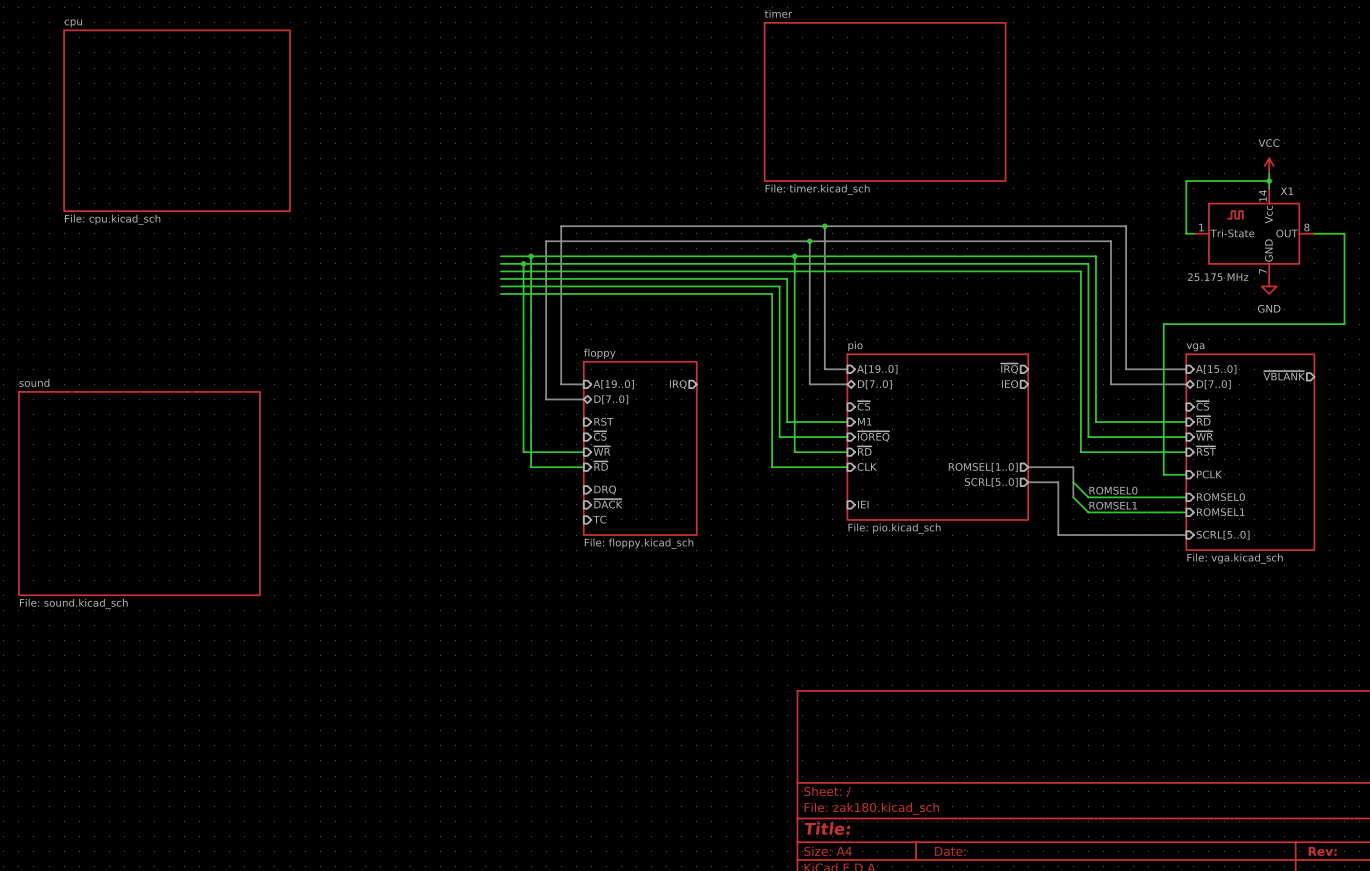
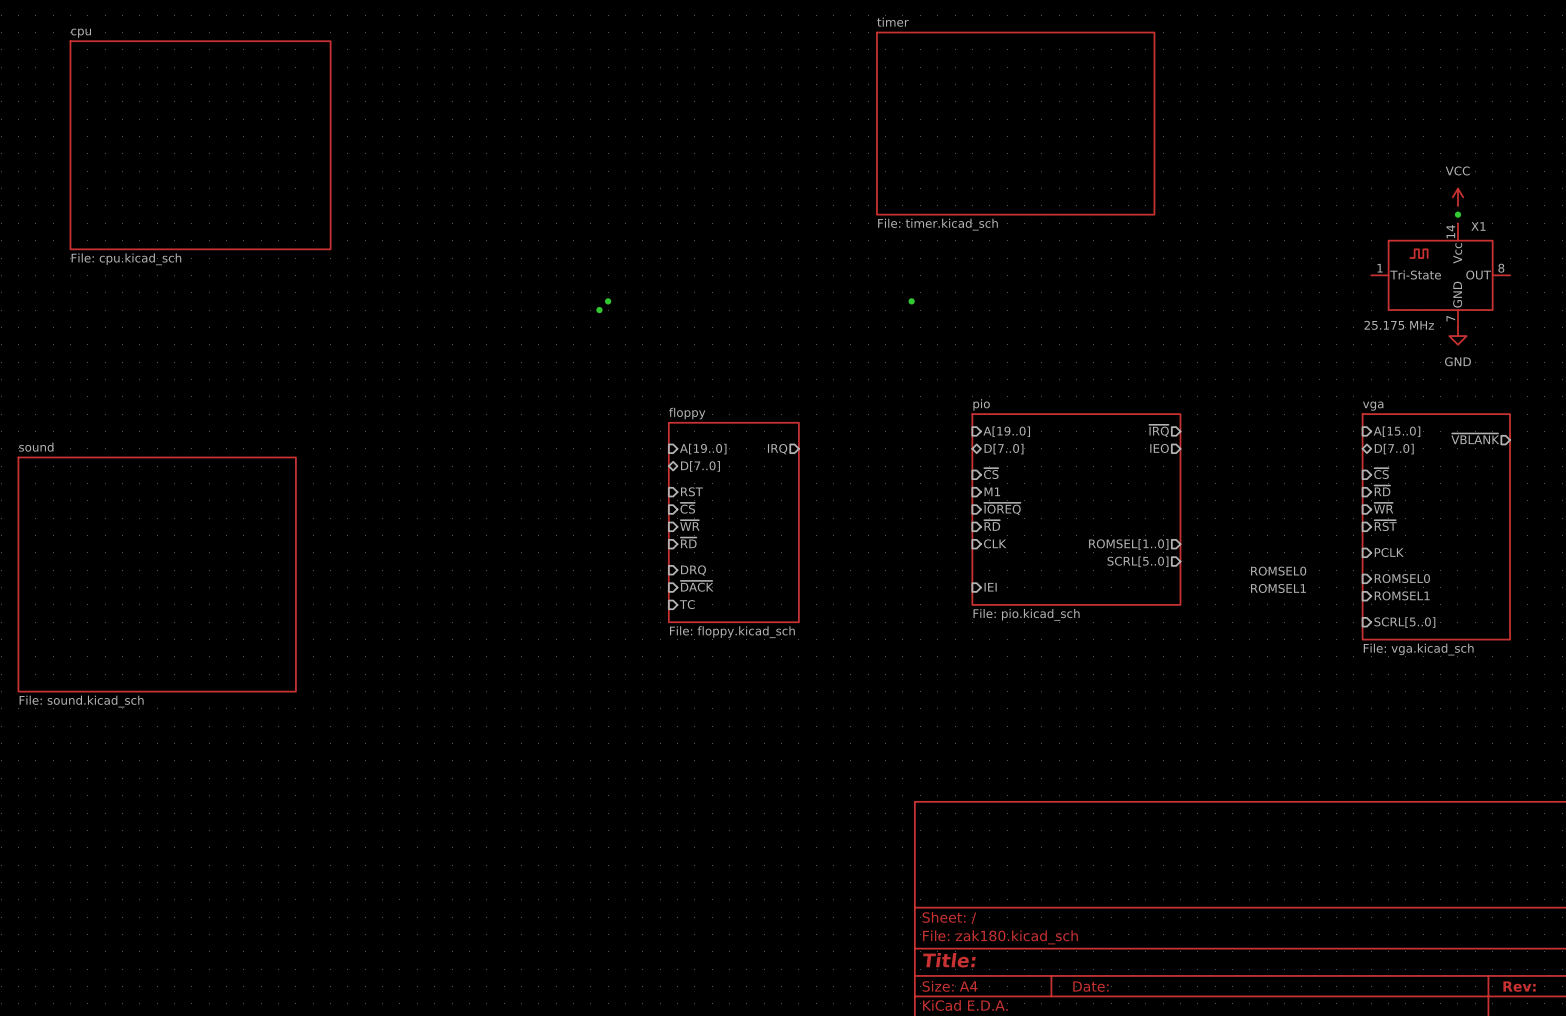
wire: (1269, 173) (1269, 188) -> none
wire: (1269, 181) (1186, 181) (1186, 233) (1193, 233) -> none
bus: (824, 226) (824, 369) (847, 369) -> none
junction: (824, 226) -> none
wire: (1314, 233) (1344, 233) (1344, 324) (1163, 324) (1163, 474) (1186, 474) -> none
bus: (809, 241) (809, 384) (847, 384) -> none
junction: (809, 241) -> none
wire: (500, 256) (1095, 256) (1095, 422) (1186, 422) -> none
wire: (531, 256) (531, 467) (583, 467) -> none
wire: (794, 256) (794, 452) (847, 452) -> none
wire: (500, 263) (1088, 263) (1088, 437) (1186, 437) -> none
wire: (523, 263) (523, 452) (583, 452) -> none
wire: (500, 271) (1080, 271) (1080, 452) (1186, 452) -> none
wire: (500, 278) (787, 278) (787, 422) (847, 422) -> none
wire: (500, 286) (779, 286) (779, 437) (847, 437) -> none
wire: (500, 293) (772, 293) (772, 467) (847, 467) -> none
bus: (1186, 369) (1126, 369) (1126, 226) (561, 226) (561, 384) (583, 384) -> none
bus: (1186, 384) (1111, 384) (1111, 241) (546, 241) (546, 399) (583, 399) -> none
bus: (1028, 467) (1073, 467) (1073, 497) -> none
bus: (1028, 482) (1058, 482) (1058, 535) (1186, 535) -> none
wire: (1073, 482) (1088, 497) (1186, 497) -> none
wire: (1073, 497) (1088, 512) (1186, 512) -> none

